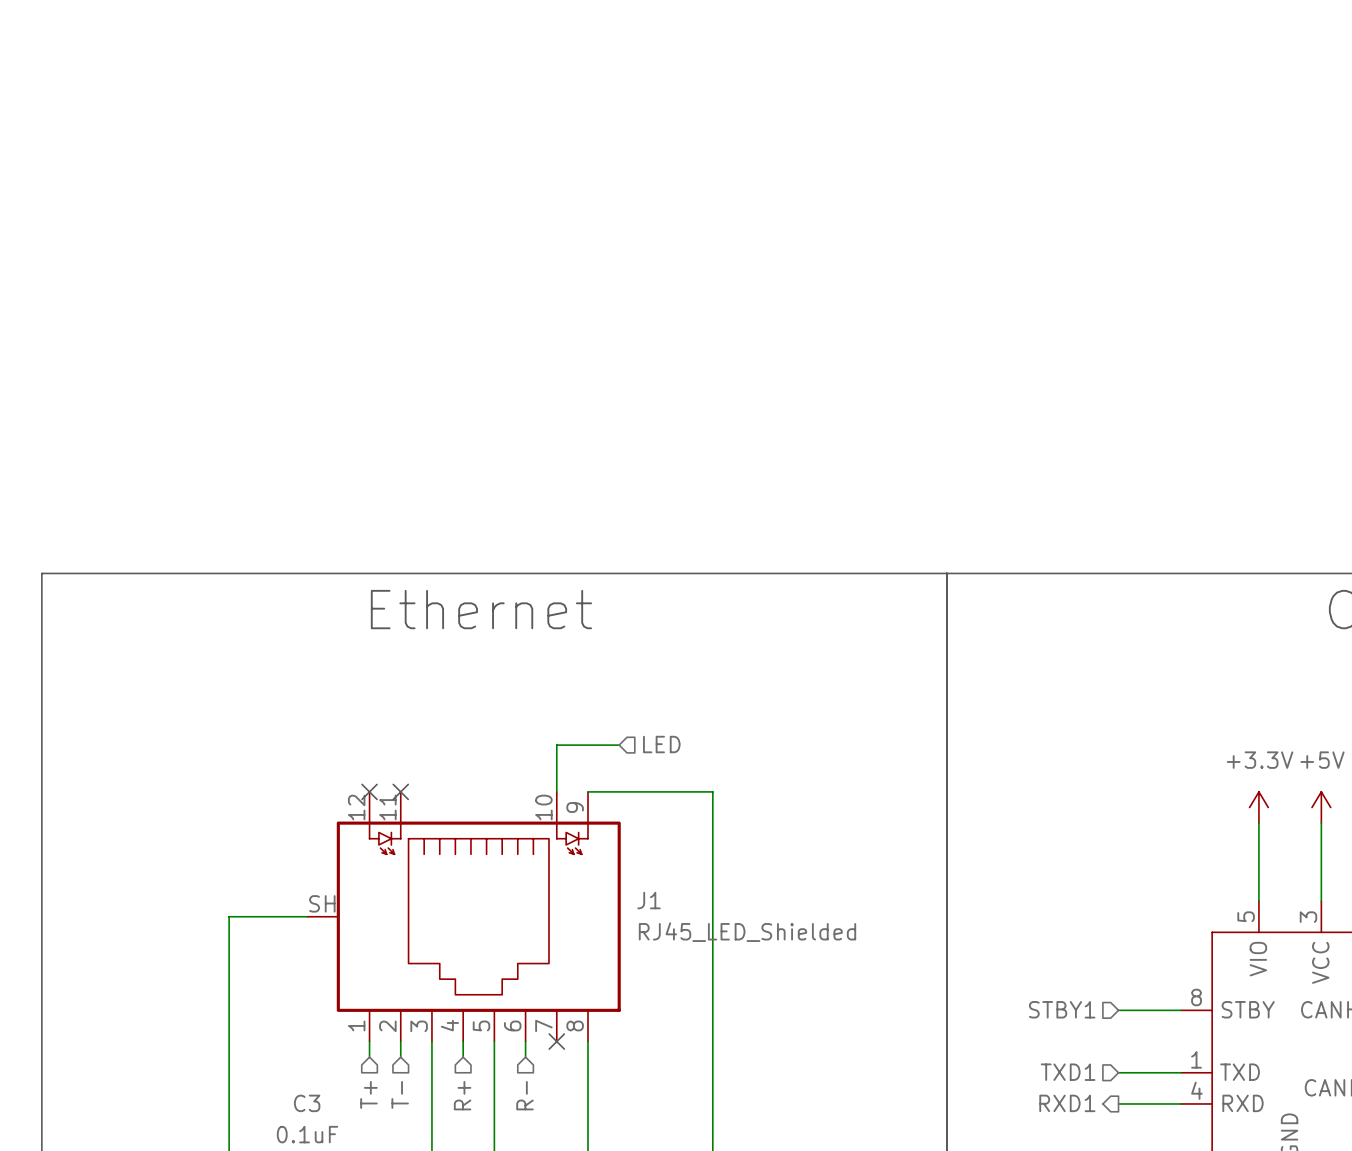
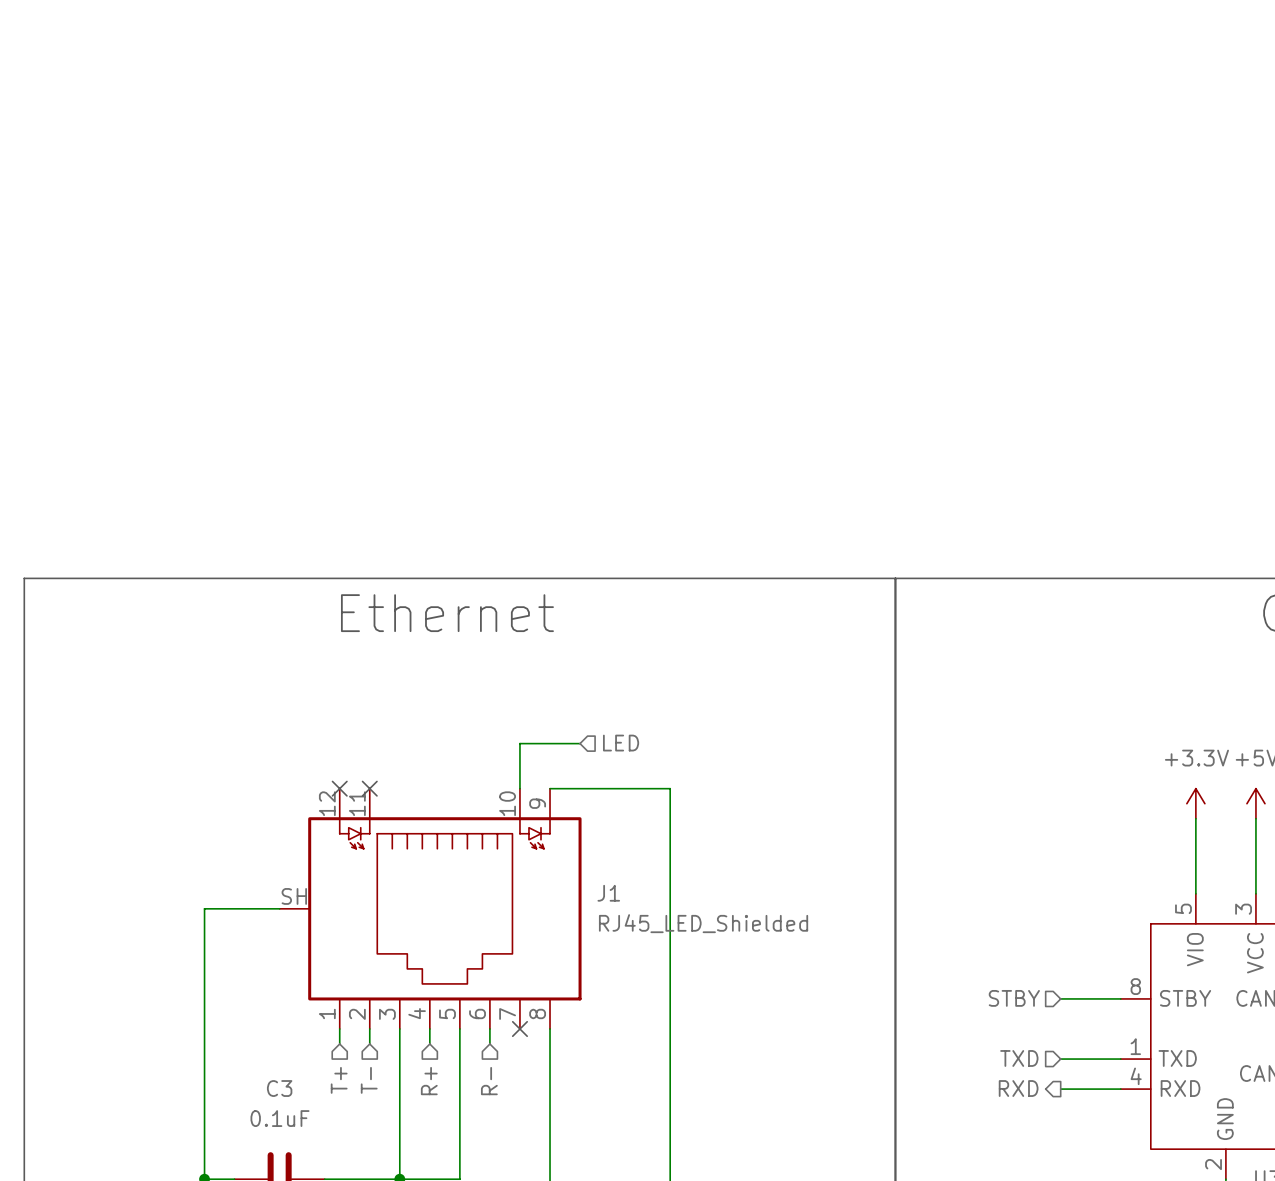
hierarchical label: STBY1 (1062, 1009) -> STBY (1014, 998)
hierarchical label: TXD1 (1068, 1072) -> TXD (1019, 1058)
hierarchical label: RXD1 (1067, 1103) -> RXD (1018, 1088)

